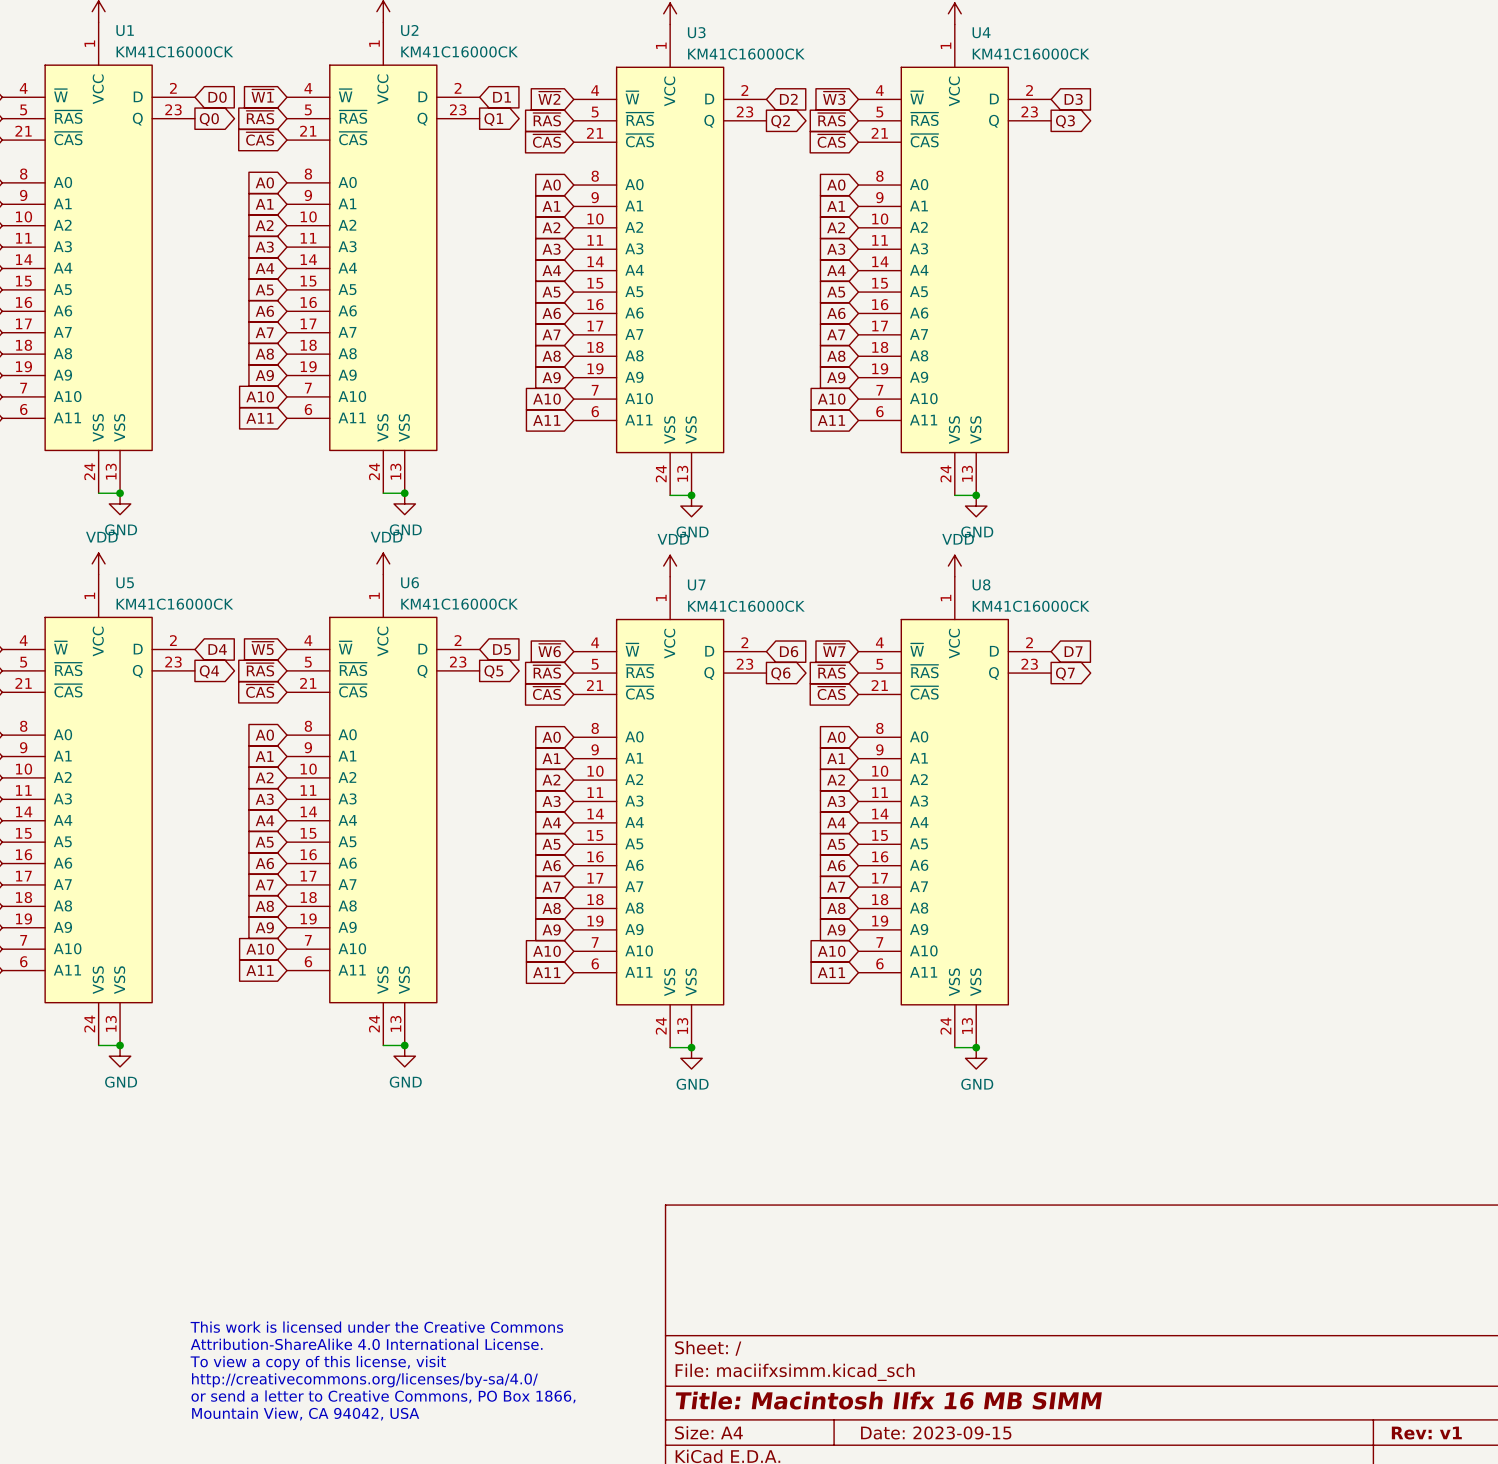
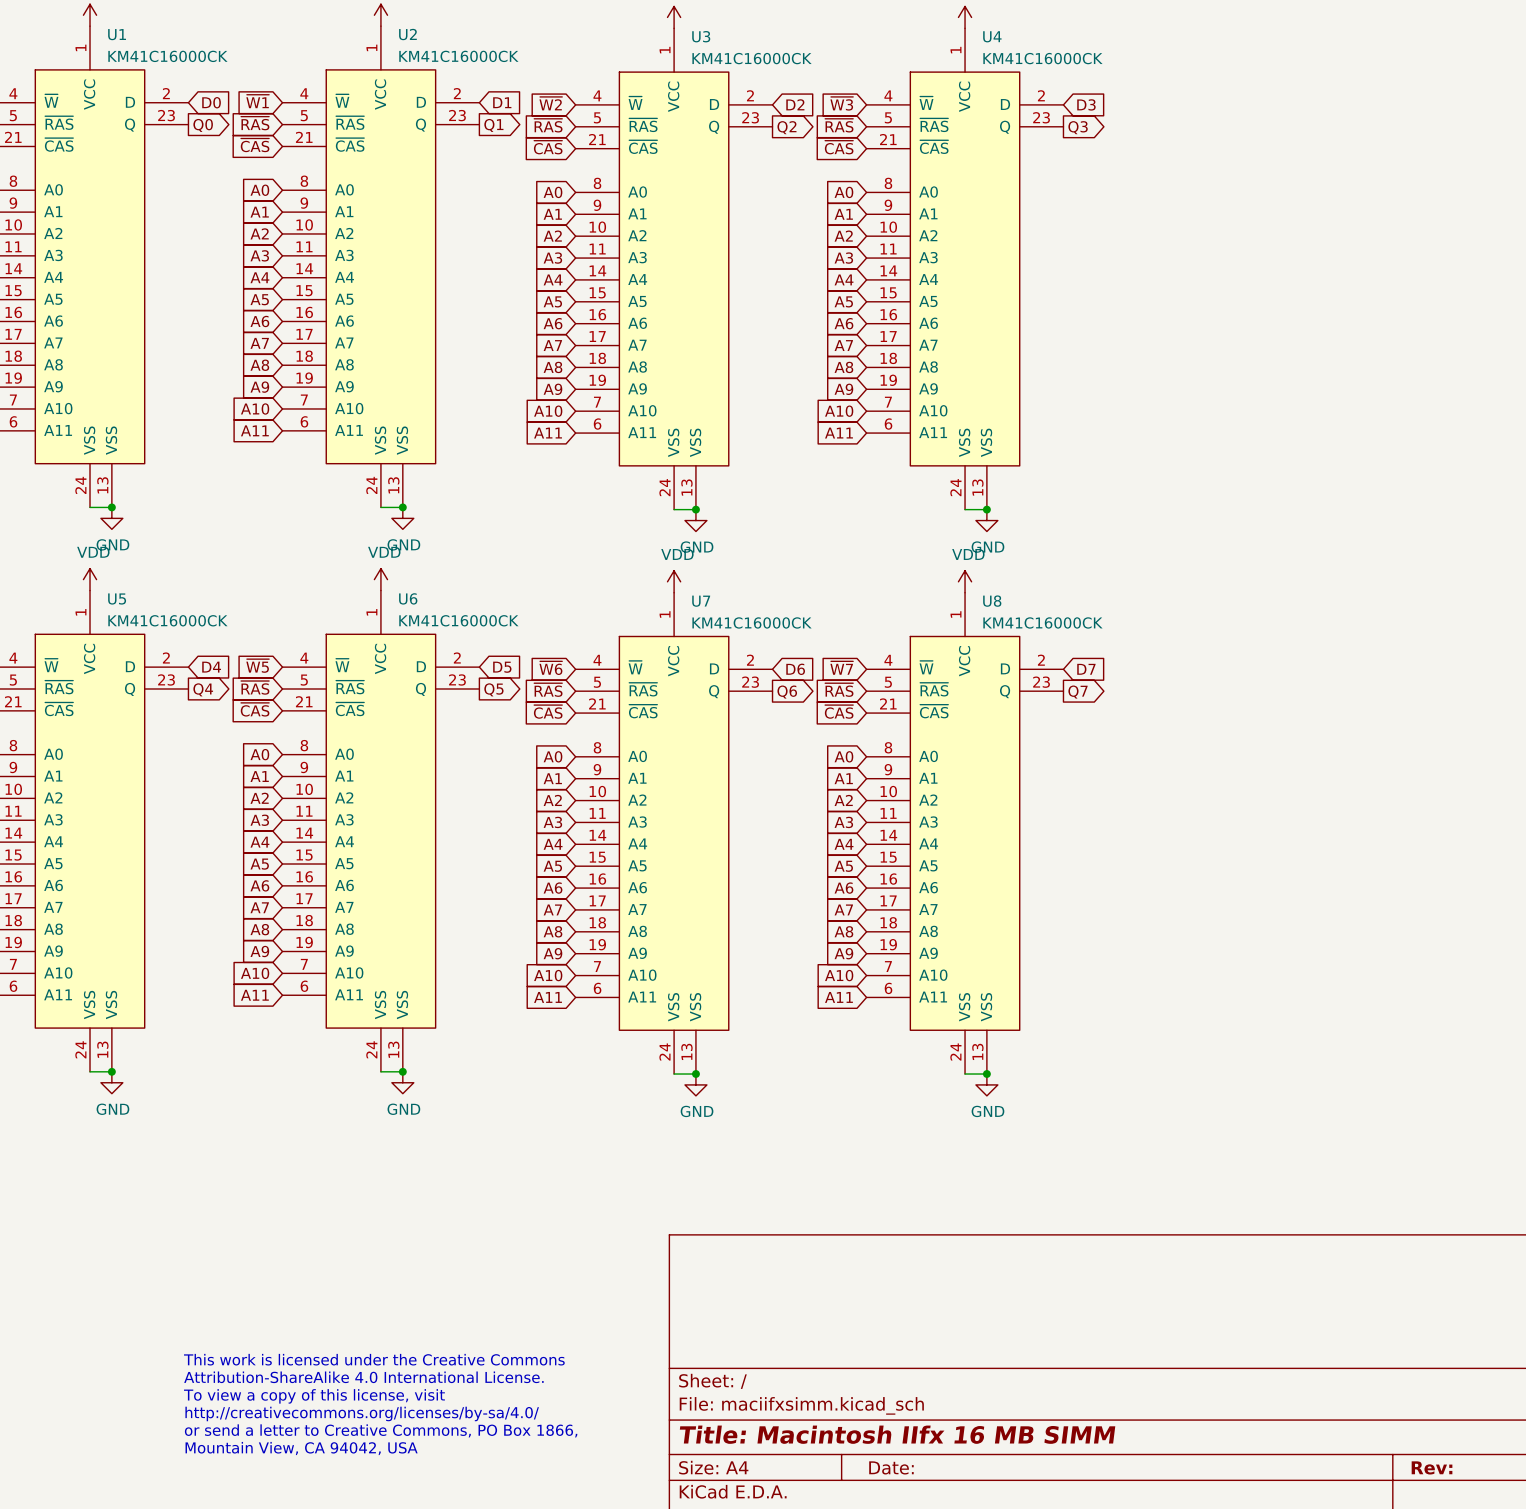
title block: Date: 2023-09-15 (936, 1432) -> Date: (891, 1467)
title block: Rev: v1 (1426, 1433) -> Rev: (1432, 1467)

